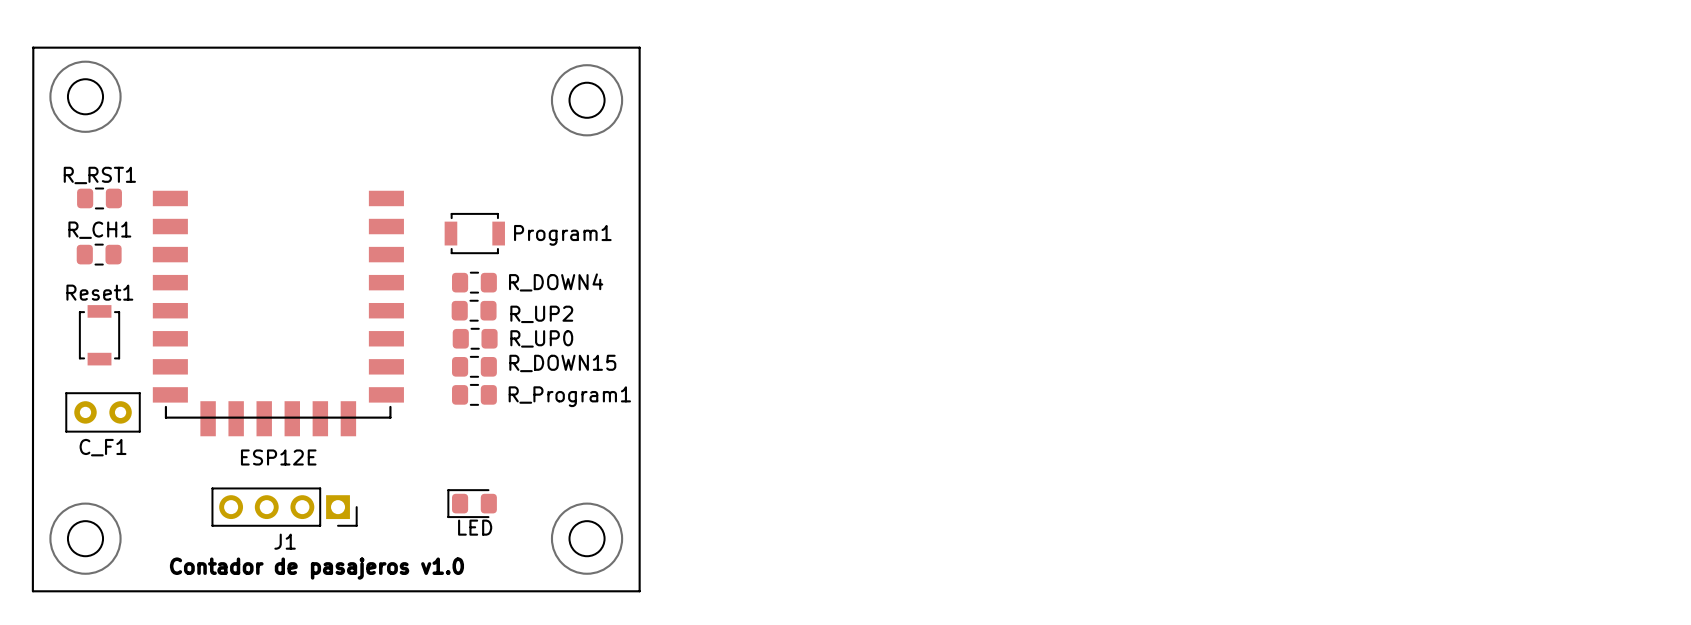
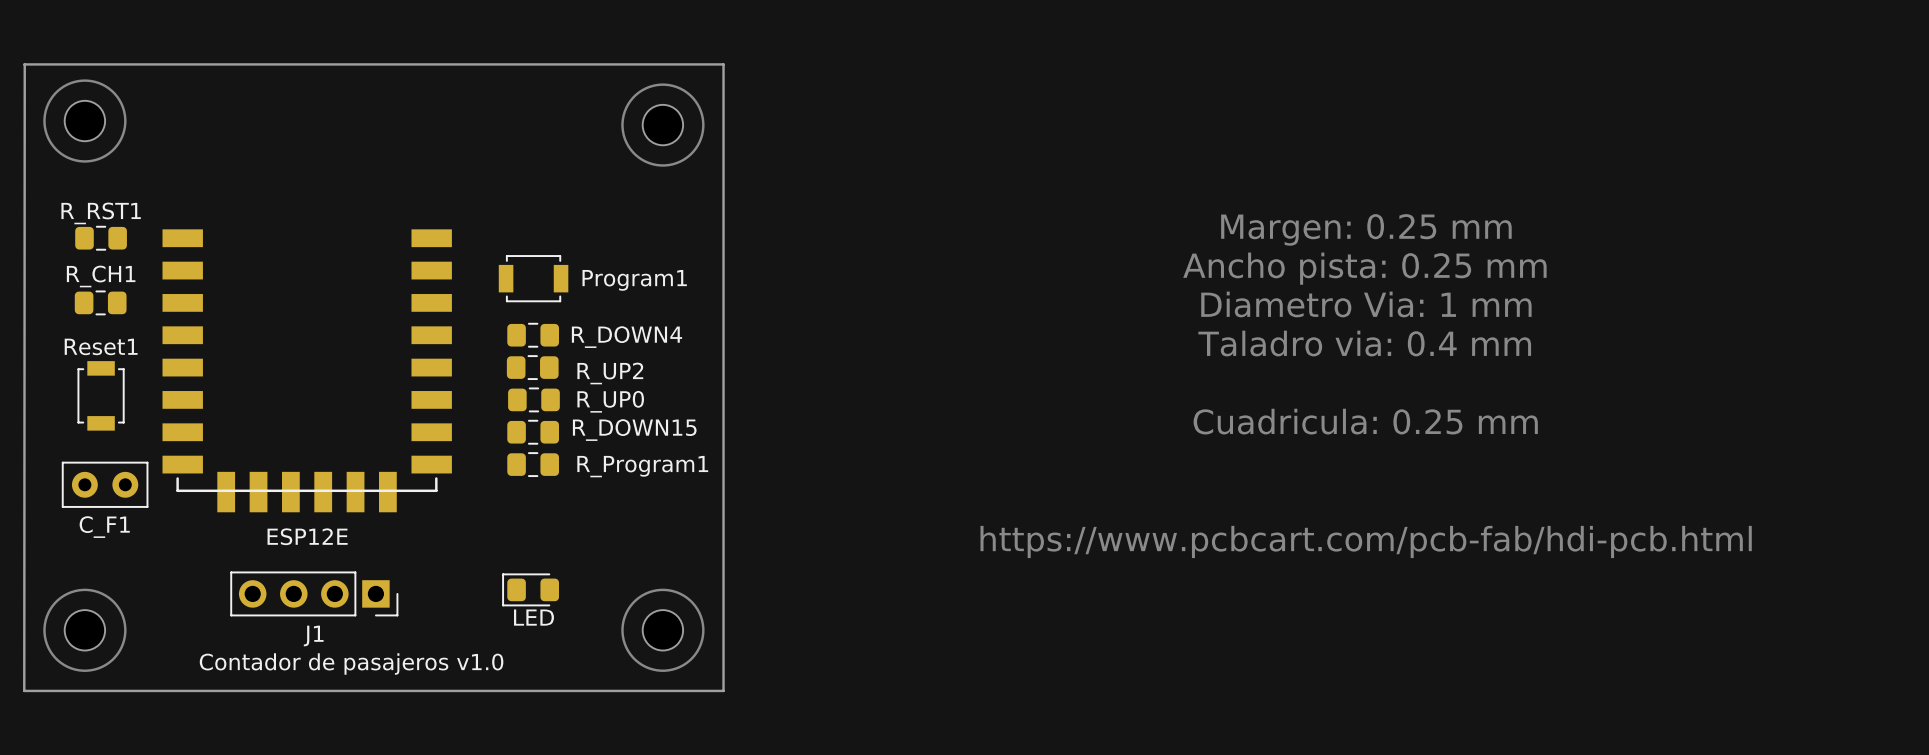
text: none -> Margen: 0.25 mm (1366, 229)
text: none -> Ancho pista: 0.25 mm (1364, 268)
text: none -> Diametro Via: 1 mm (1366, 304)
text: none -> Taladro via: 0.4 mm (1364, 343)
text: none -> Cuadricula: 0.25 mm (1365, 421)
text: none -> https://www.pcbcart.com/pcb-fab/hdi-pcb.html (1366, 541)

